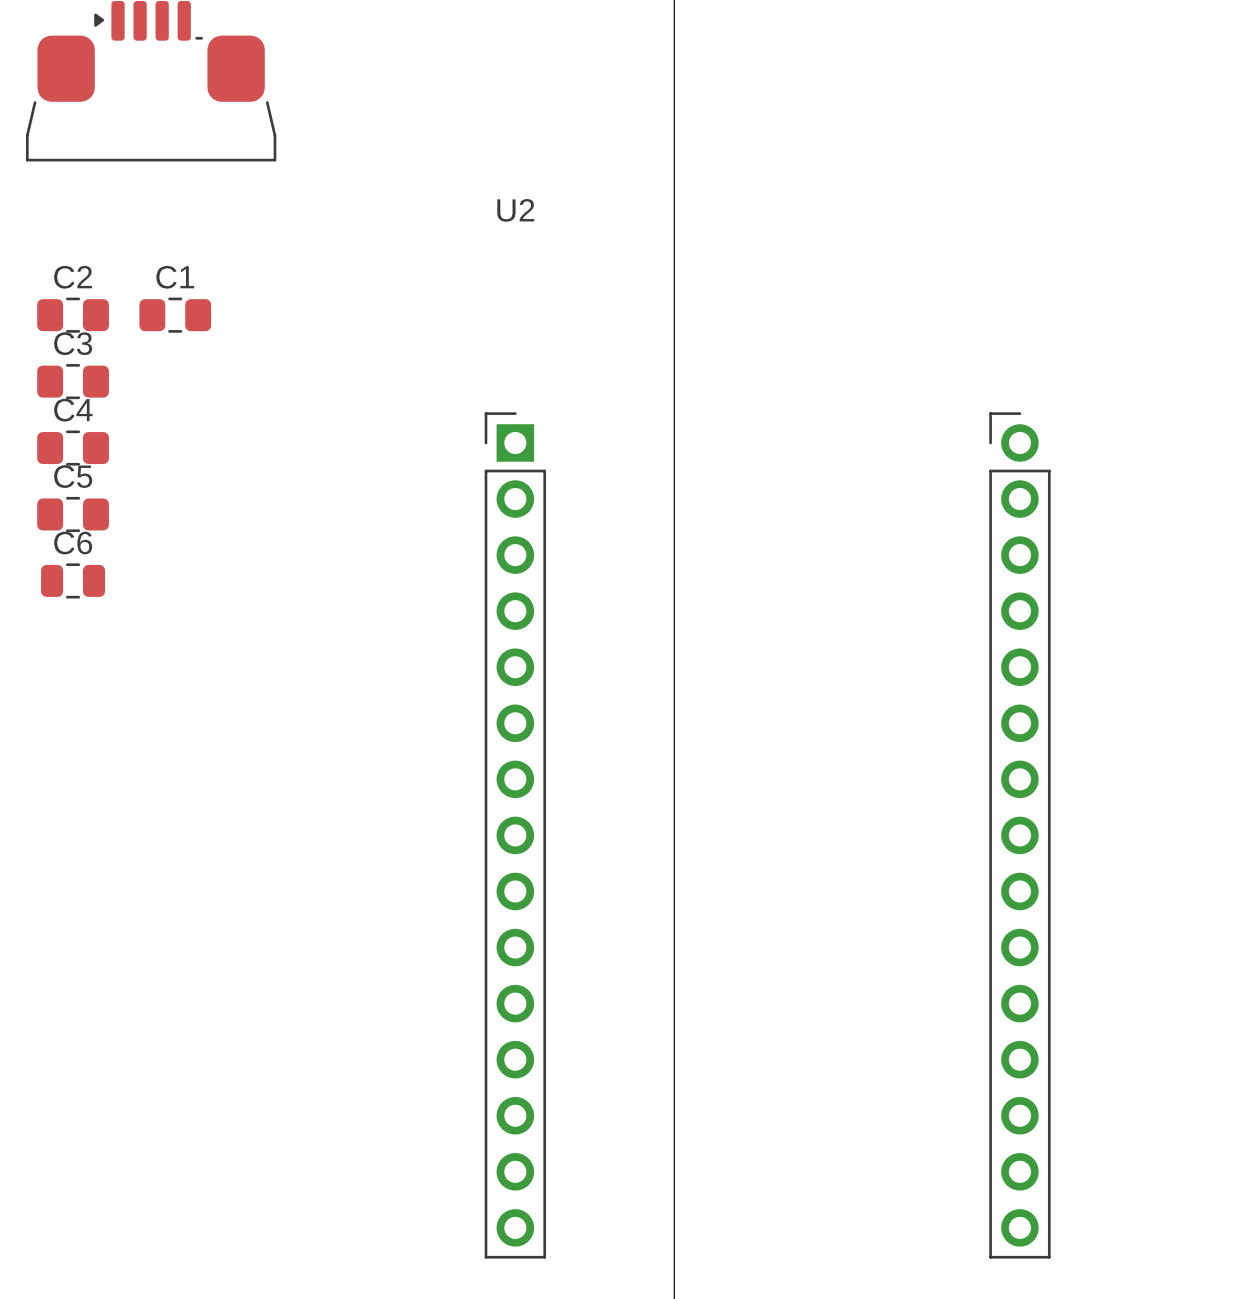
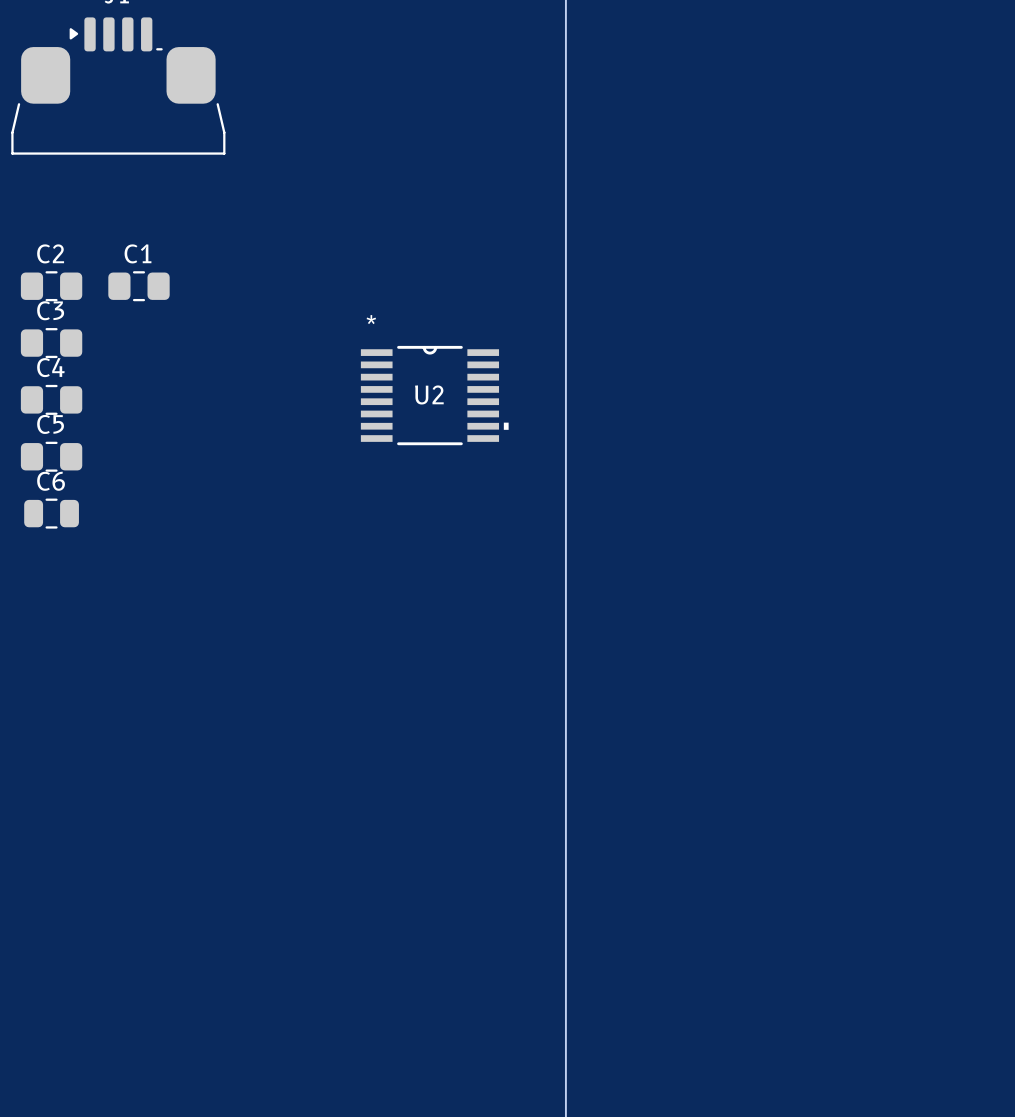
U2 name position: U2 (515, 210) -> U2 (429, 394)
U2 footprint: [484, 412, 1051, 1259] -> [360, 345, 509, 446]

